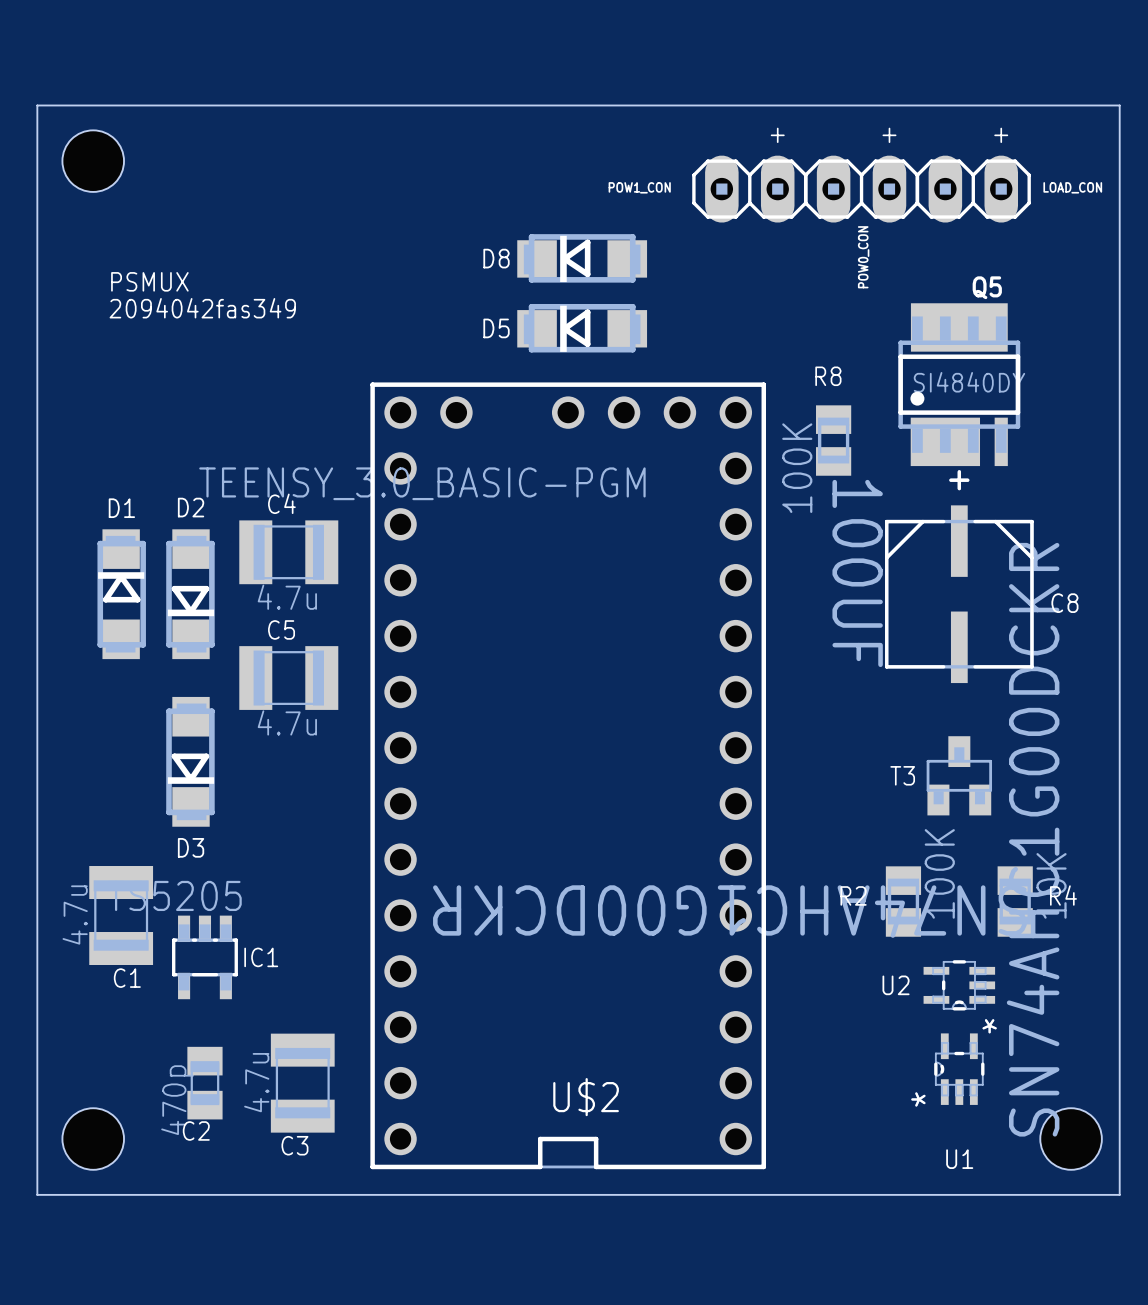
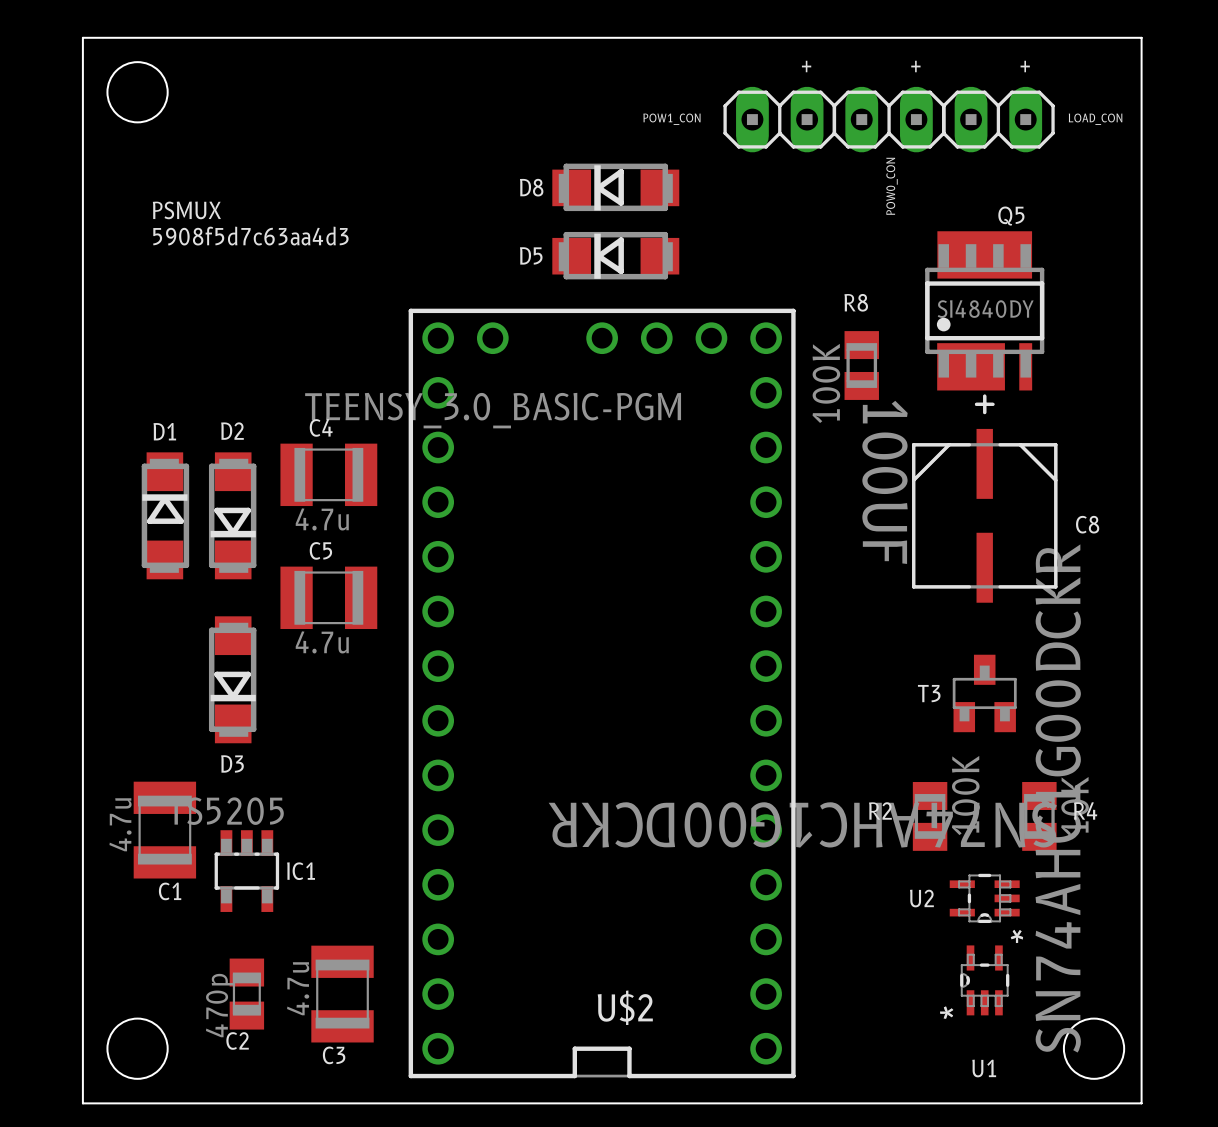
text: 2094042fas349 (202, 308) -> 5908f5d7c63aa4d3 (250, 236)

